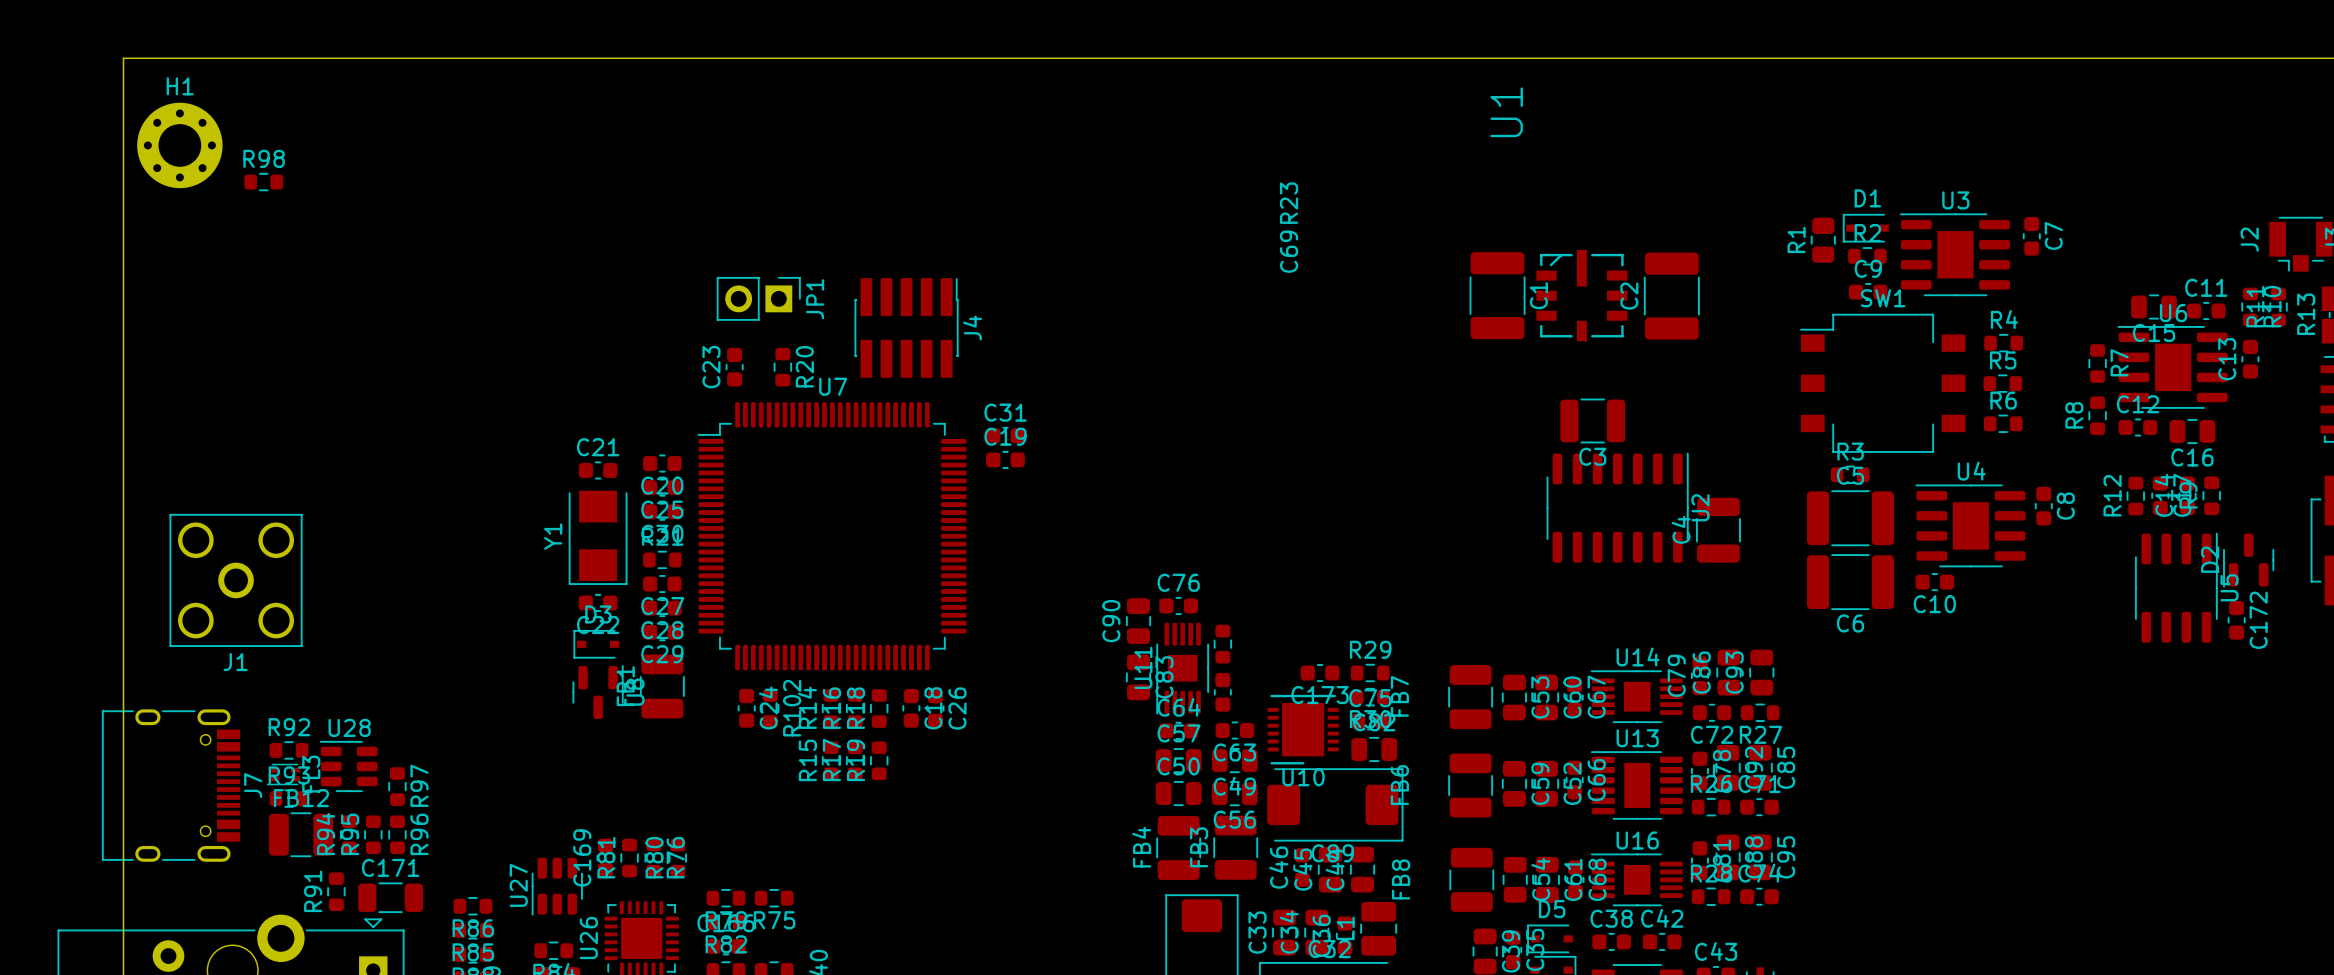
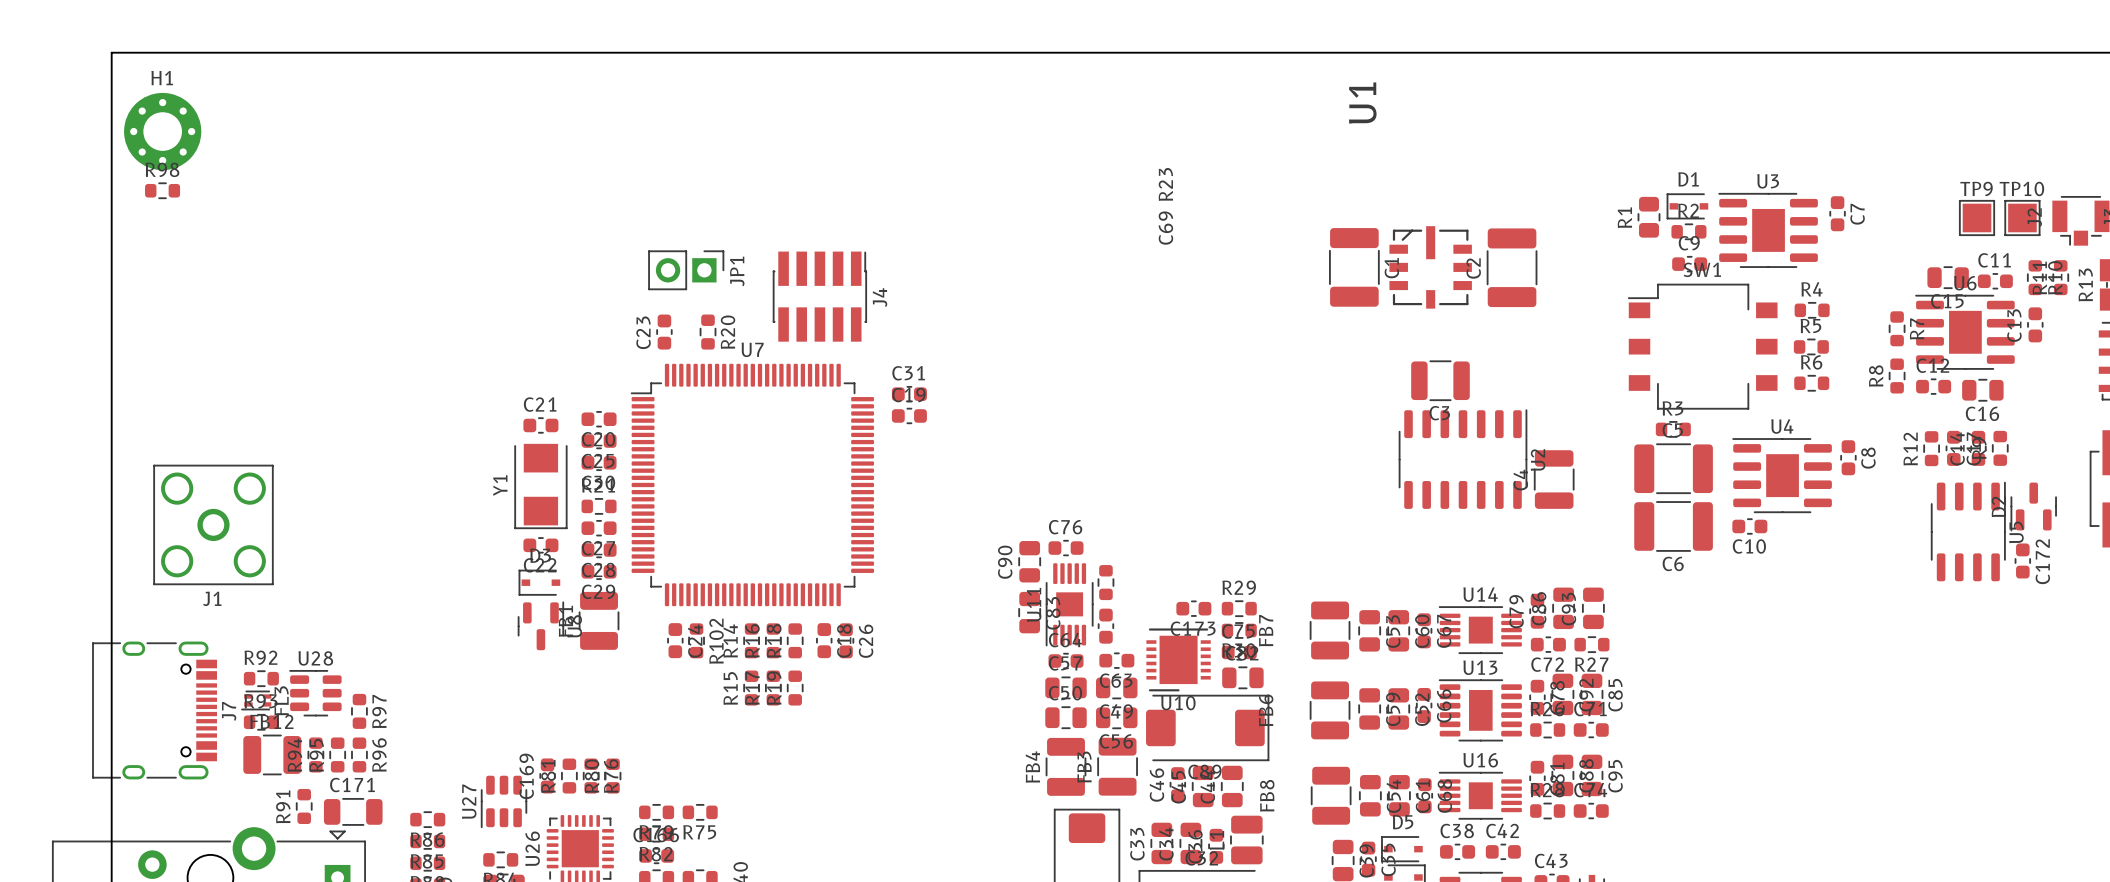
R98 position: (263, 182) -> (162, 190)
TP9: none -> (1977, 217)
TP10: none -> (2022, 217)

